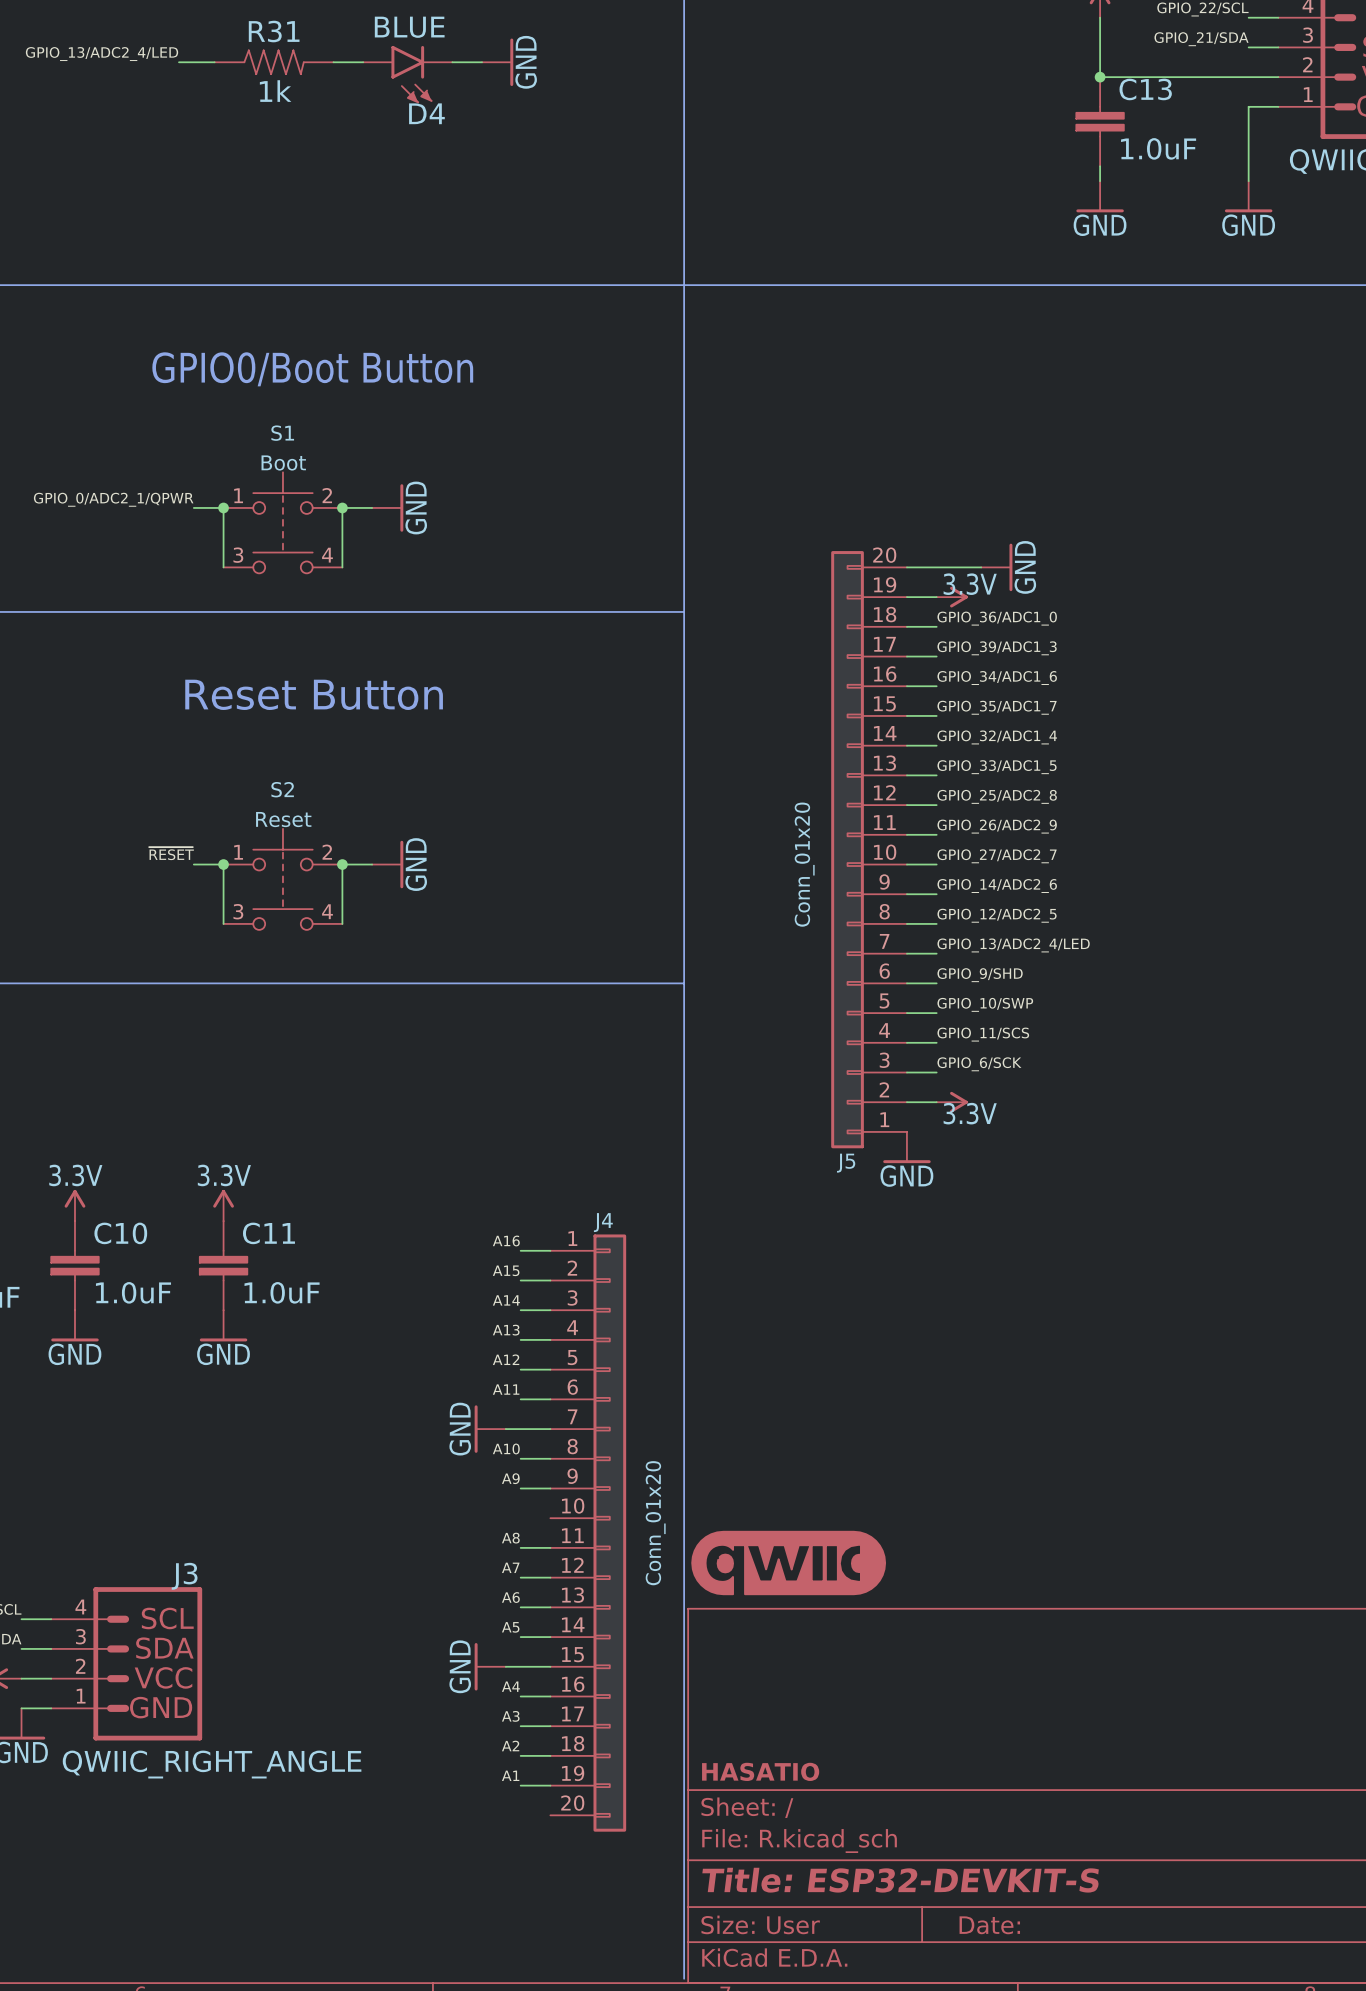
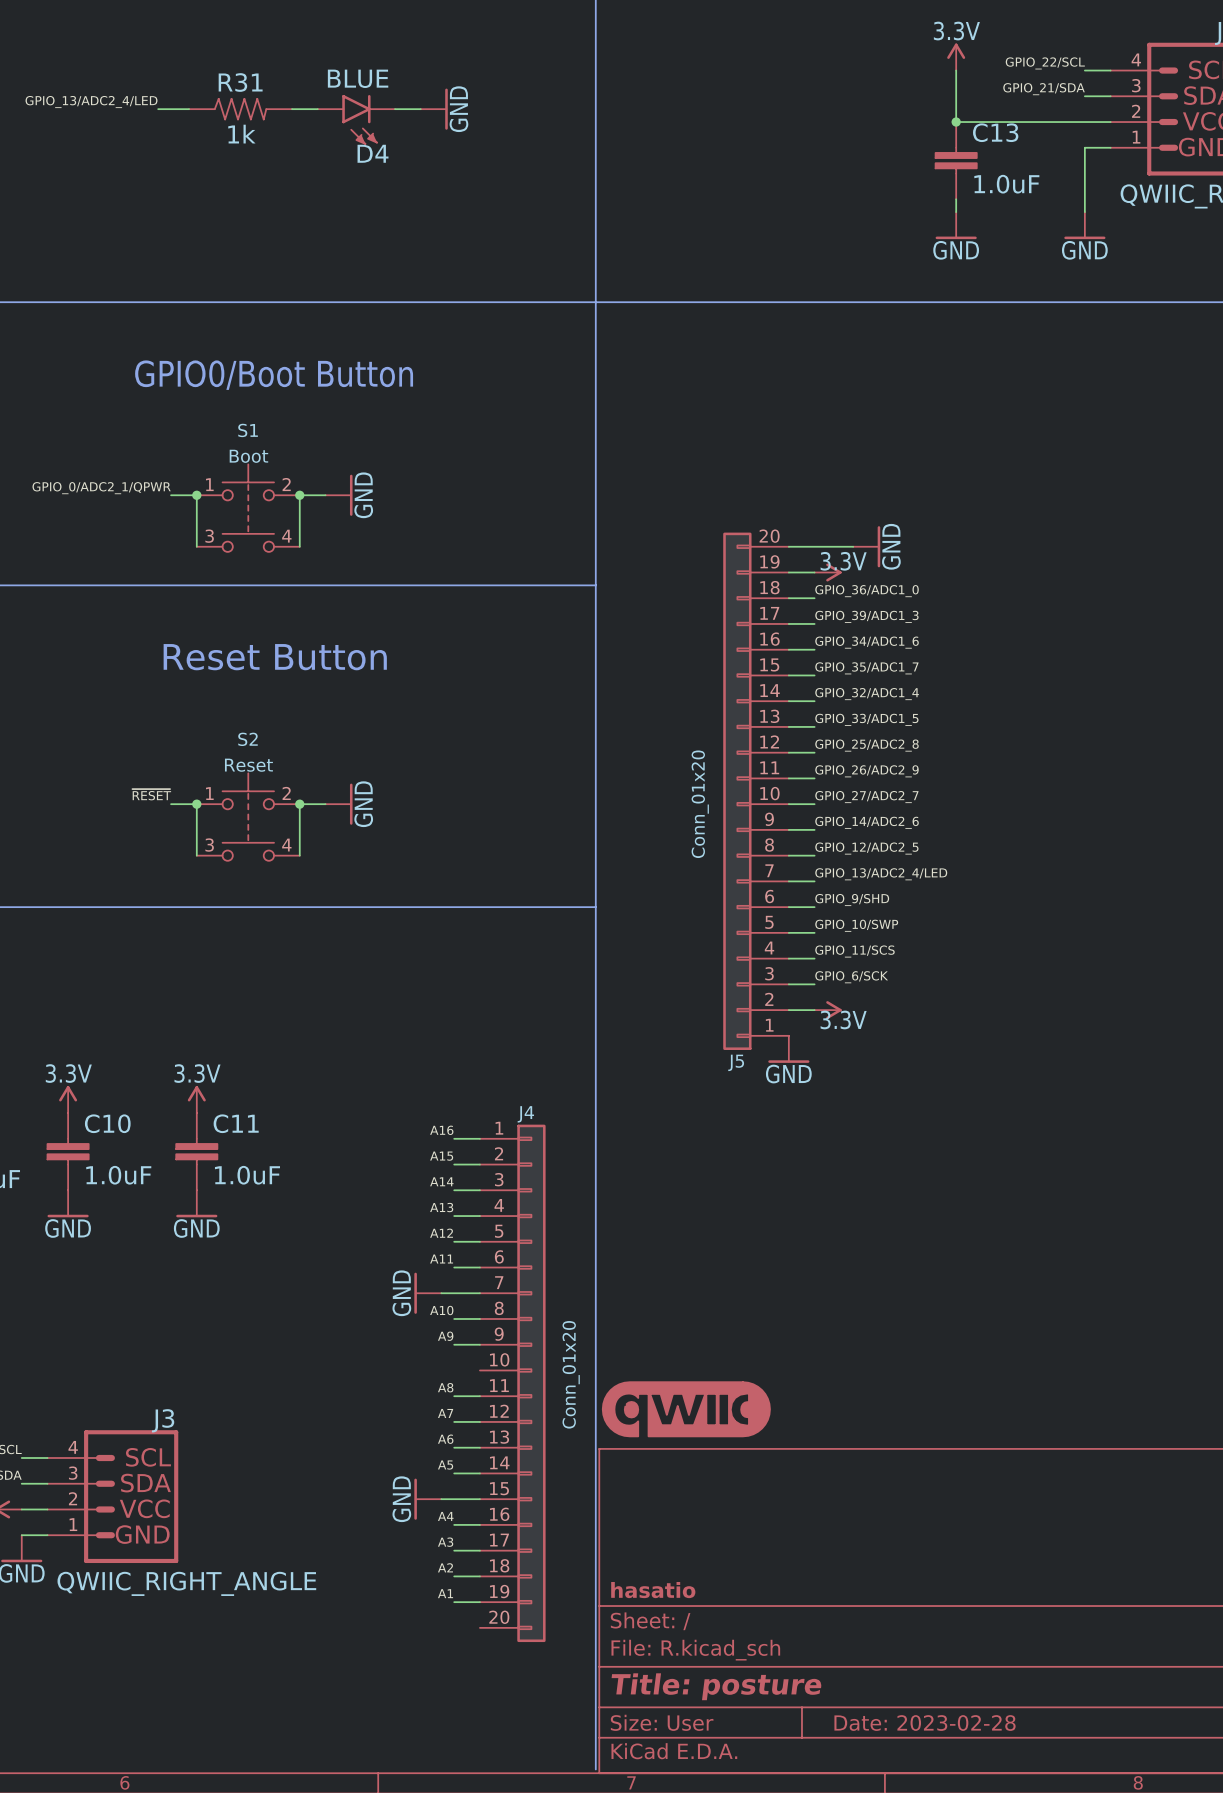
title block: HASATIO (760, 1771) -> hasatio (653, 1590)
title block: Title: ESP32-DEVKIT-S (900, 1880) -> Title: posture (716, 1686)
title block: Date: (989, 1925) -> Date: 2023-02-28 (925, 1723)

